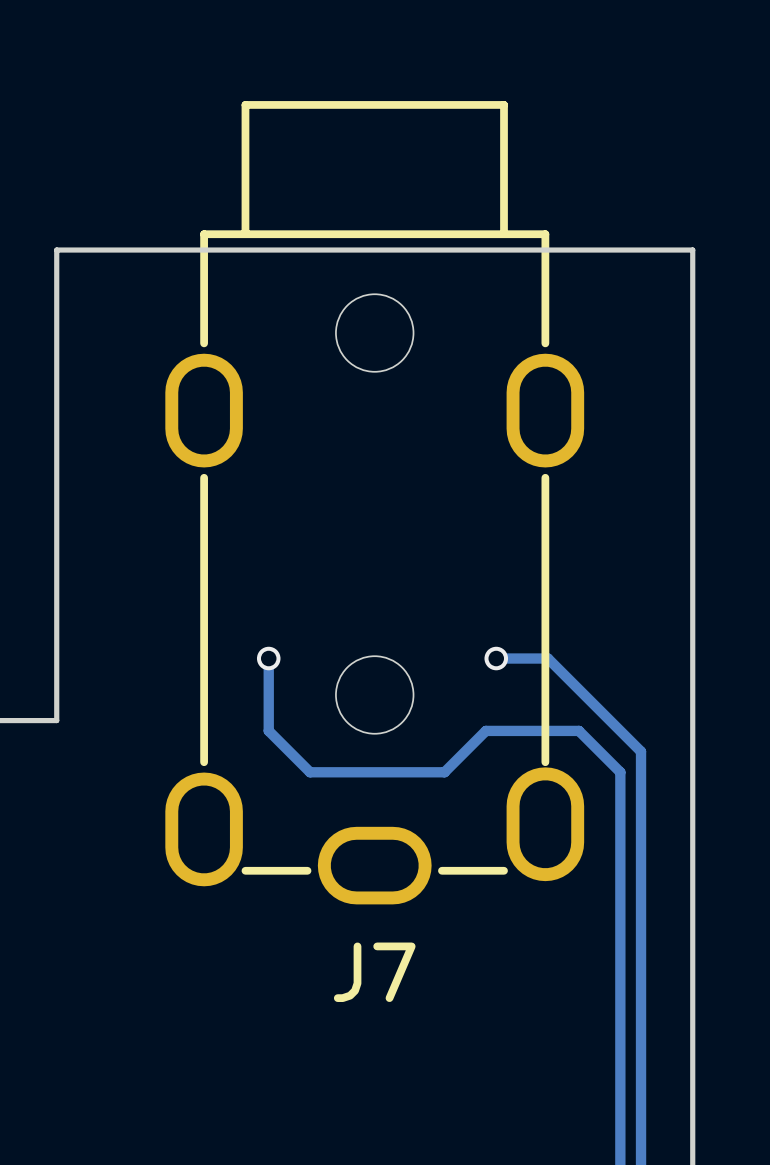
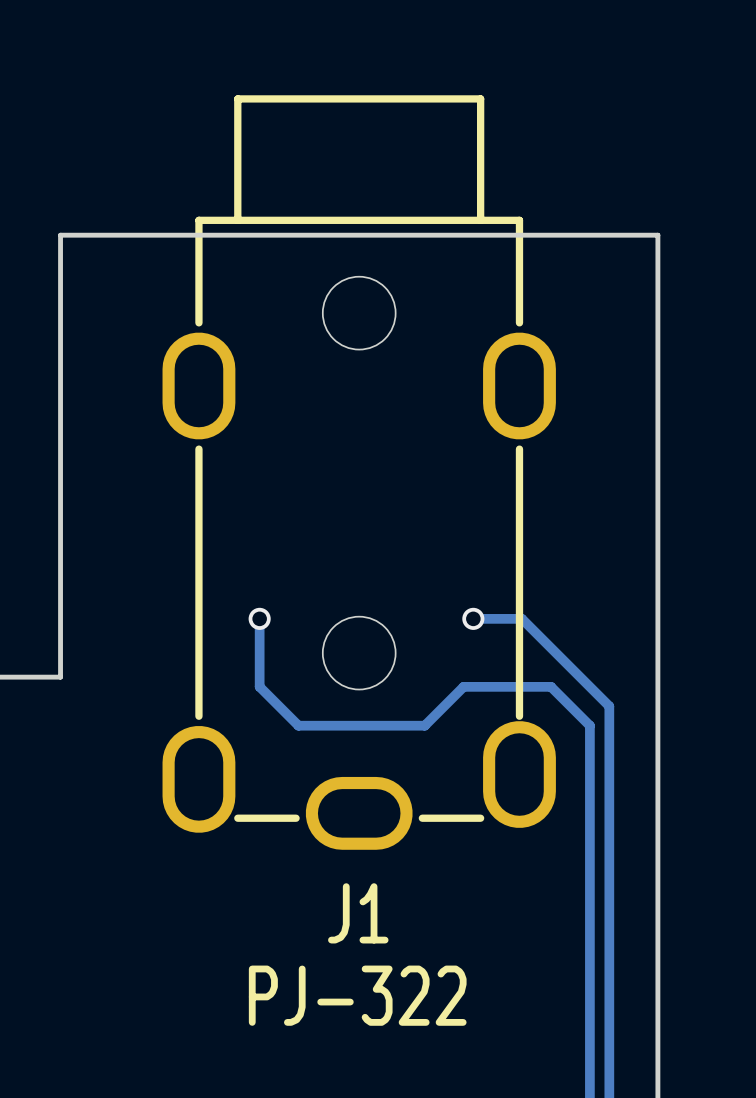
J7 name: J7 (374, 972) -> J1 (358, 913)
J7 value: none -> PJ-322 (357, 995)

